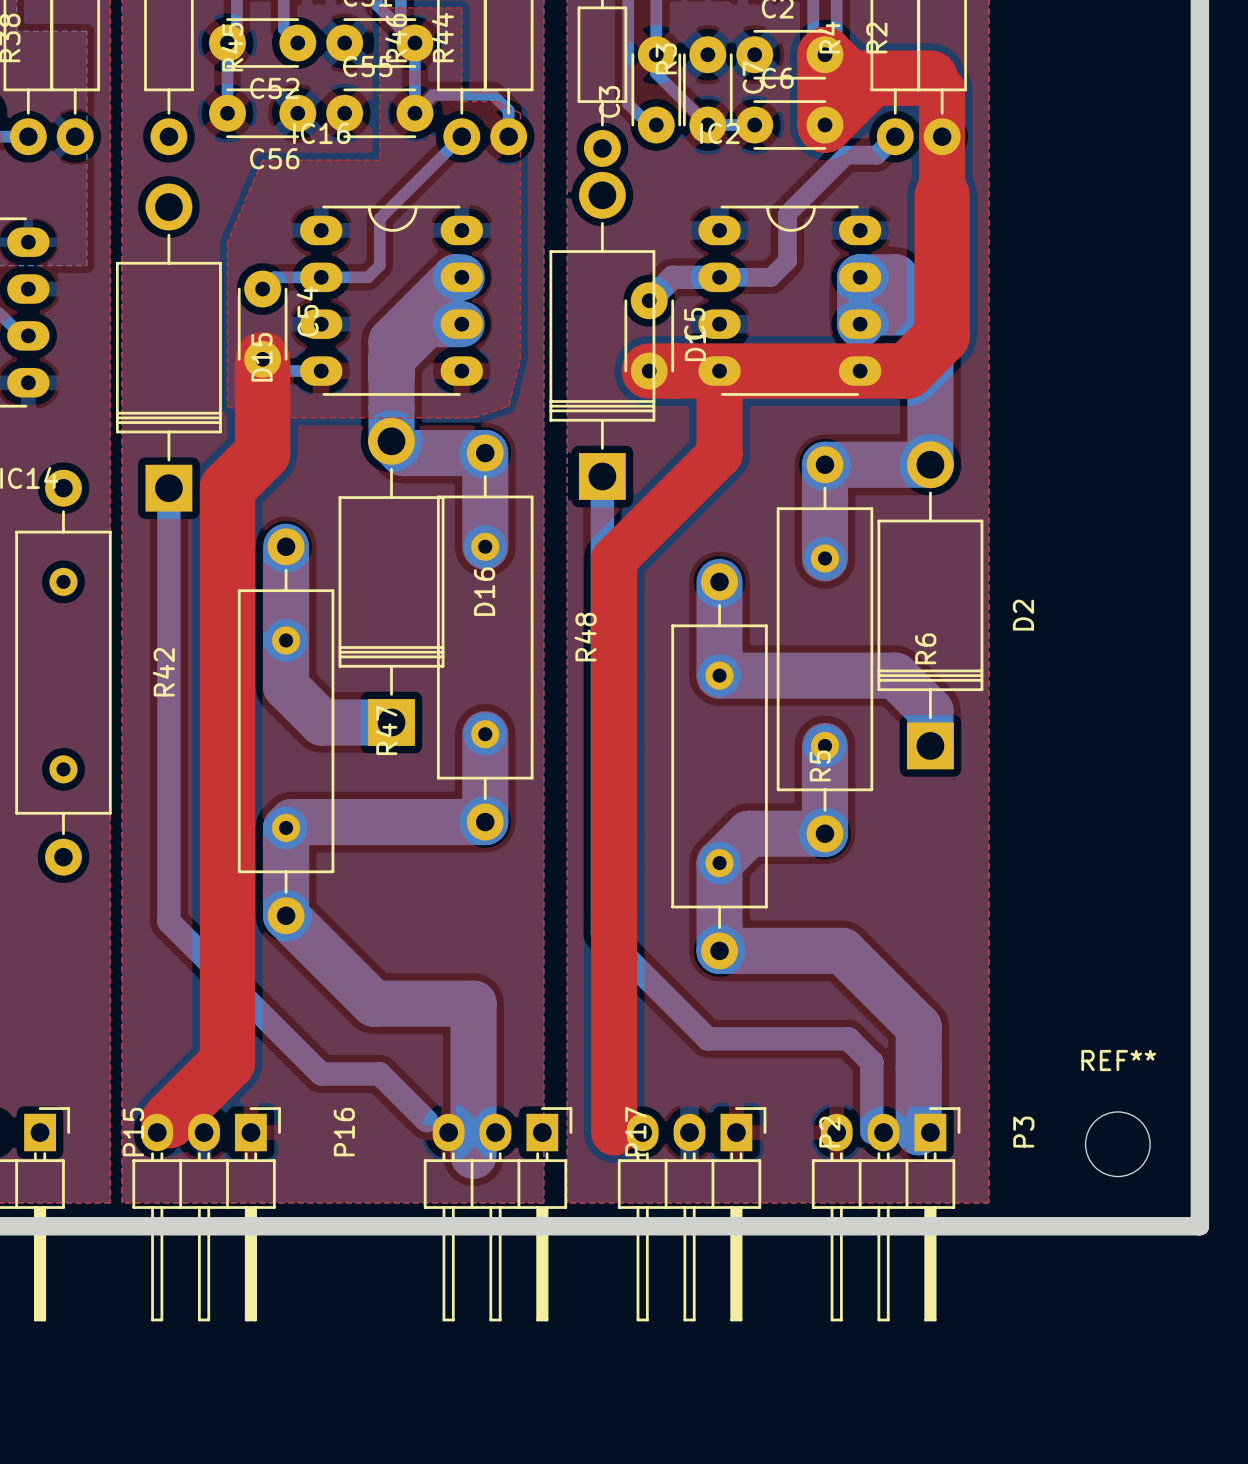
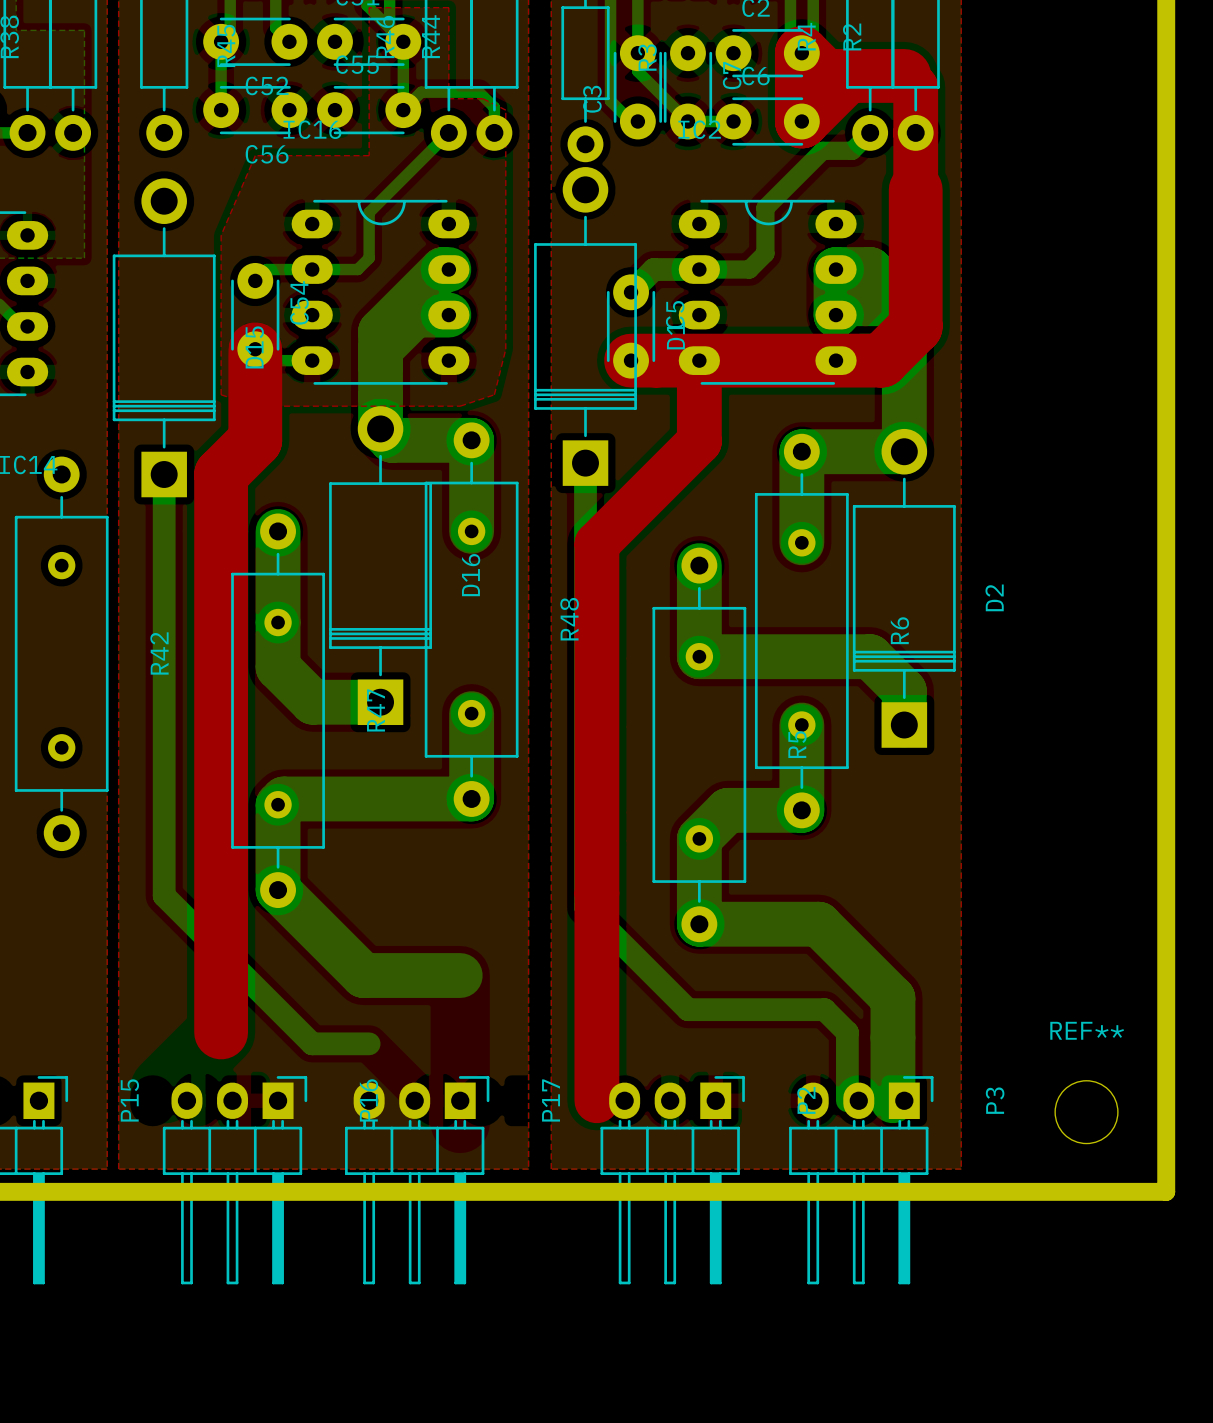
bottom track: (473, 1003) (473, 1155) -> none
top track: (227, 1062) (168, 1120) -> none
bottom track: (379, 1073) (426, 1120) -> none
P16 position: (206, 1214) -> (235, 1180)
P17 position: (498, 1214) -> (417, 1180)

